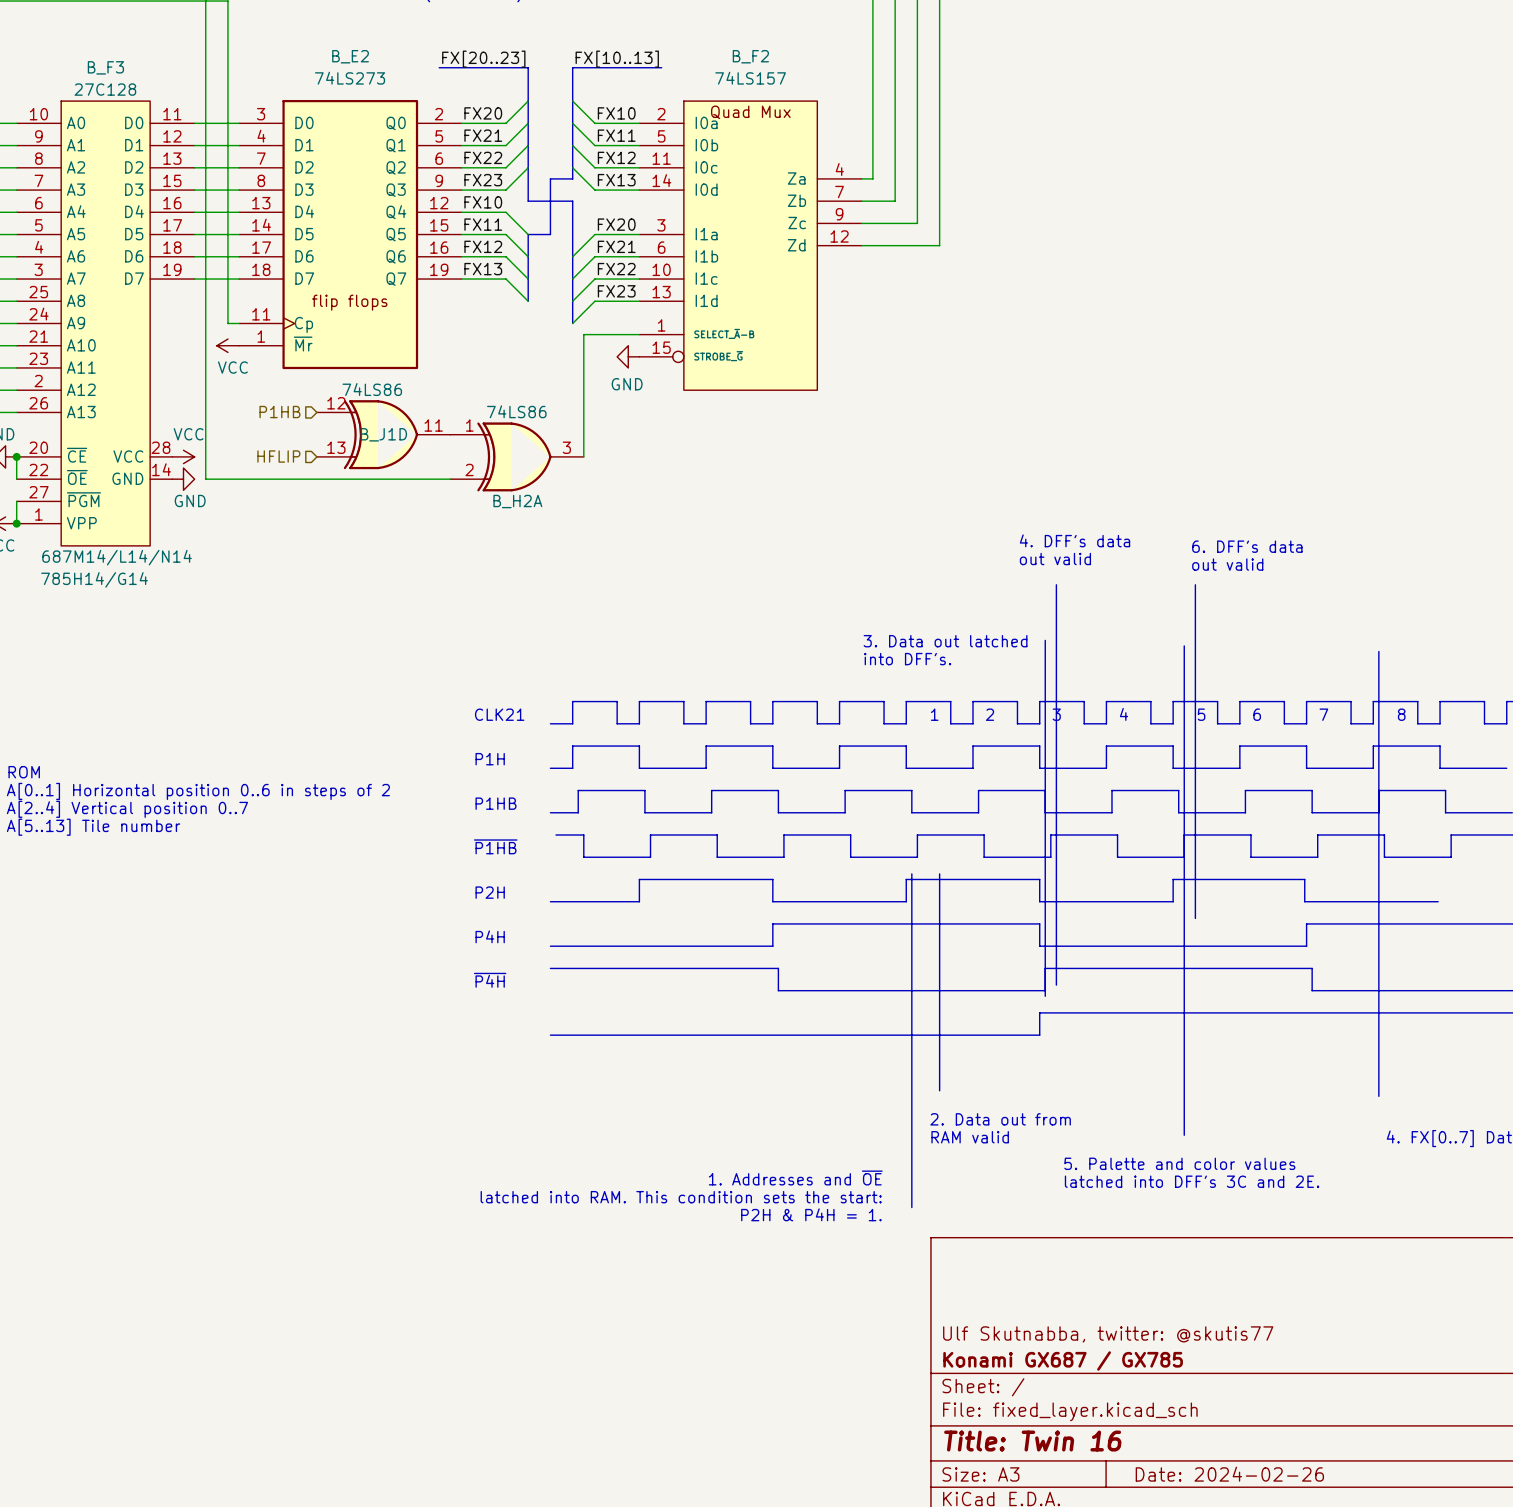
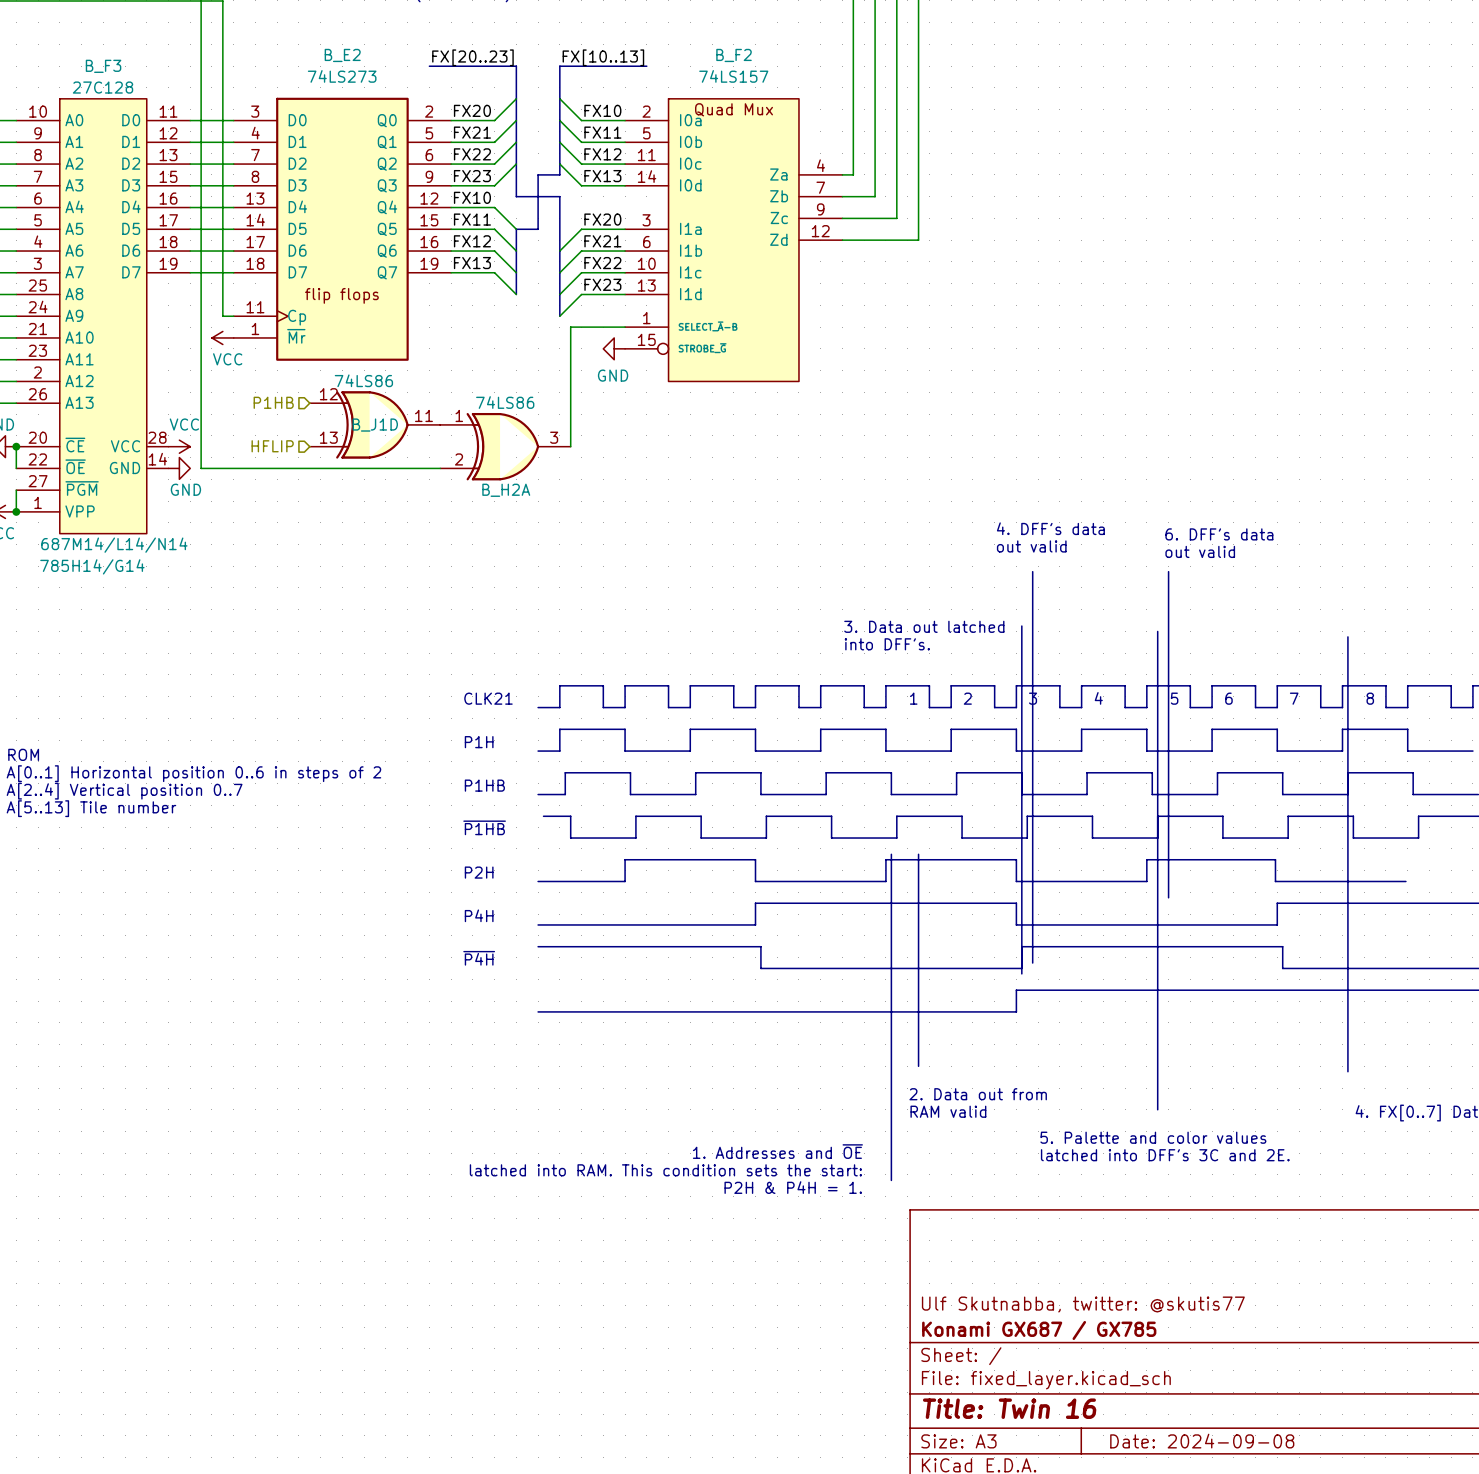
title block: Date: 2024-02-26 (1229, 1474) -> Date: 2024-09-08 (1202, 1441)

